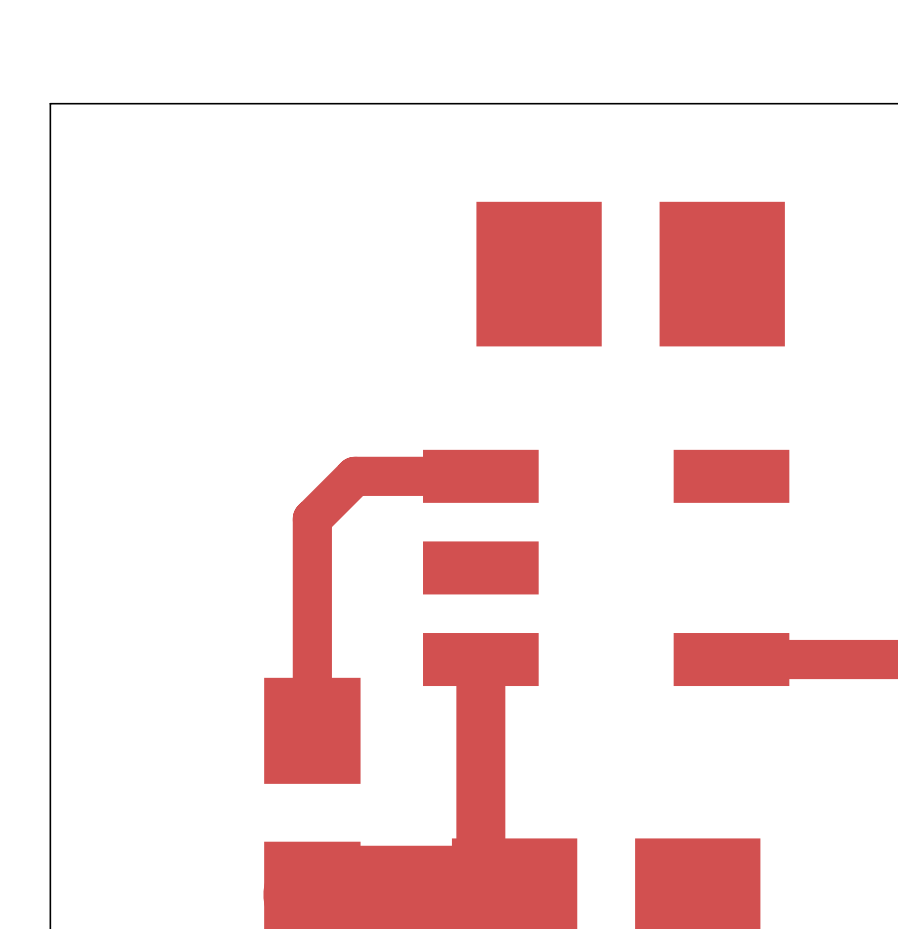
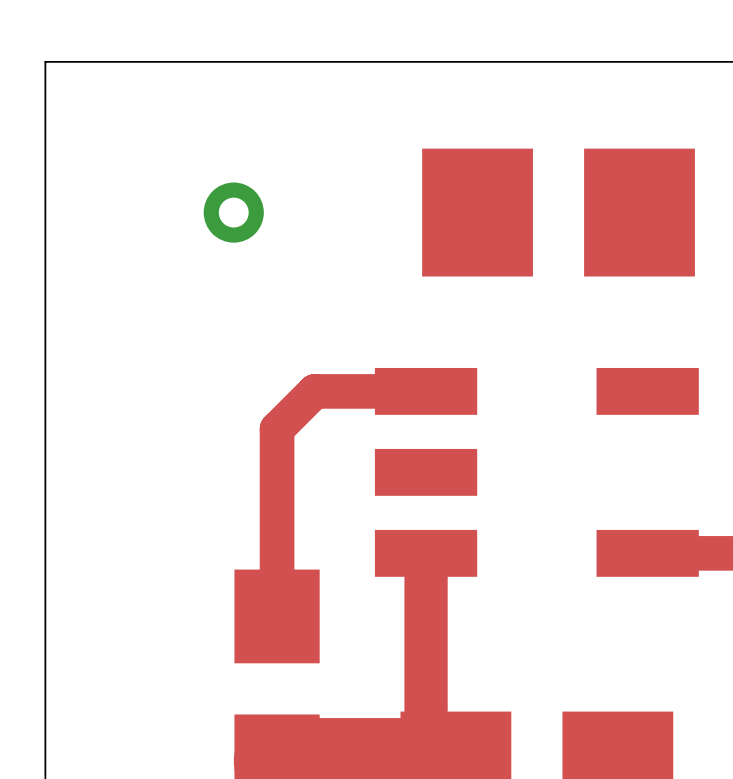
via: none -> (233, 212)

